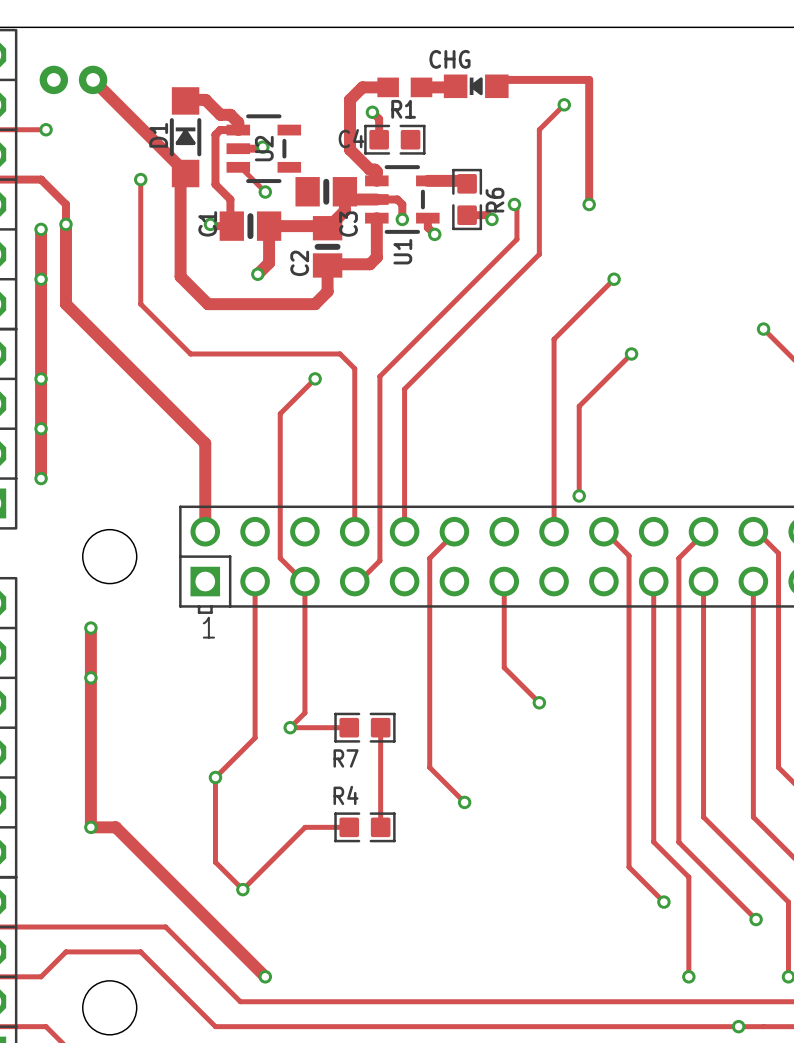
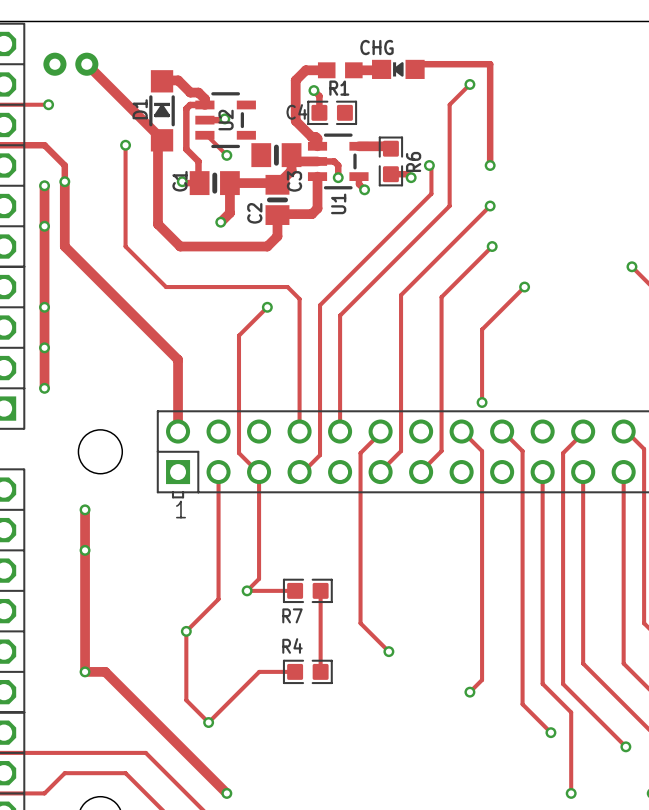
track: none -> (490, 206) (401, 295) (401, 451) (380, 471)
via: none -> (490, 206)
track: (614, 279) (554, 339) (554, 531) -> (469, 692) (482, 679) (482, 451) (461, 431)
via: (614, 279) -> none
via: none -> (492, 246)
track: (504, 581) (504, 667) (539, 702) -> (421, 472) (441, 451) (441, 297) (492, 246)
via: (539, 702) -> none
via: none -> (469, 692)

